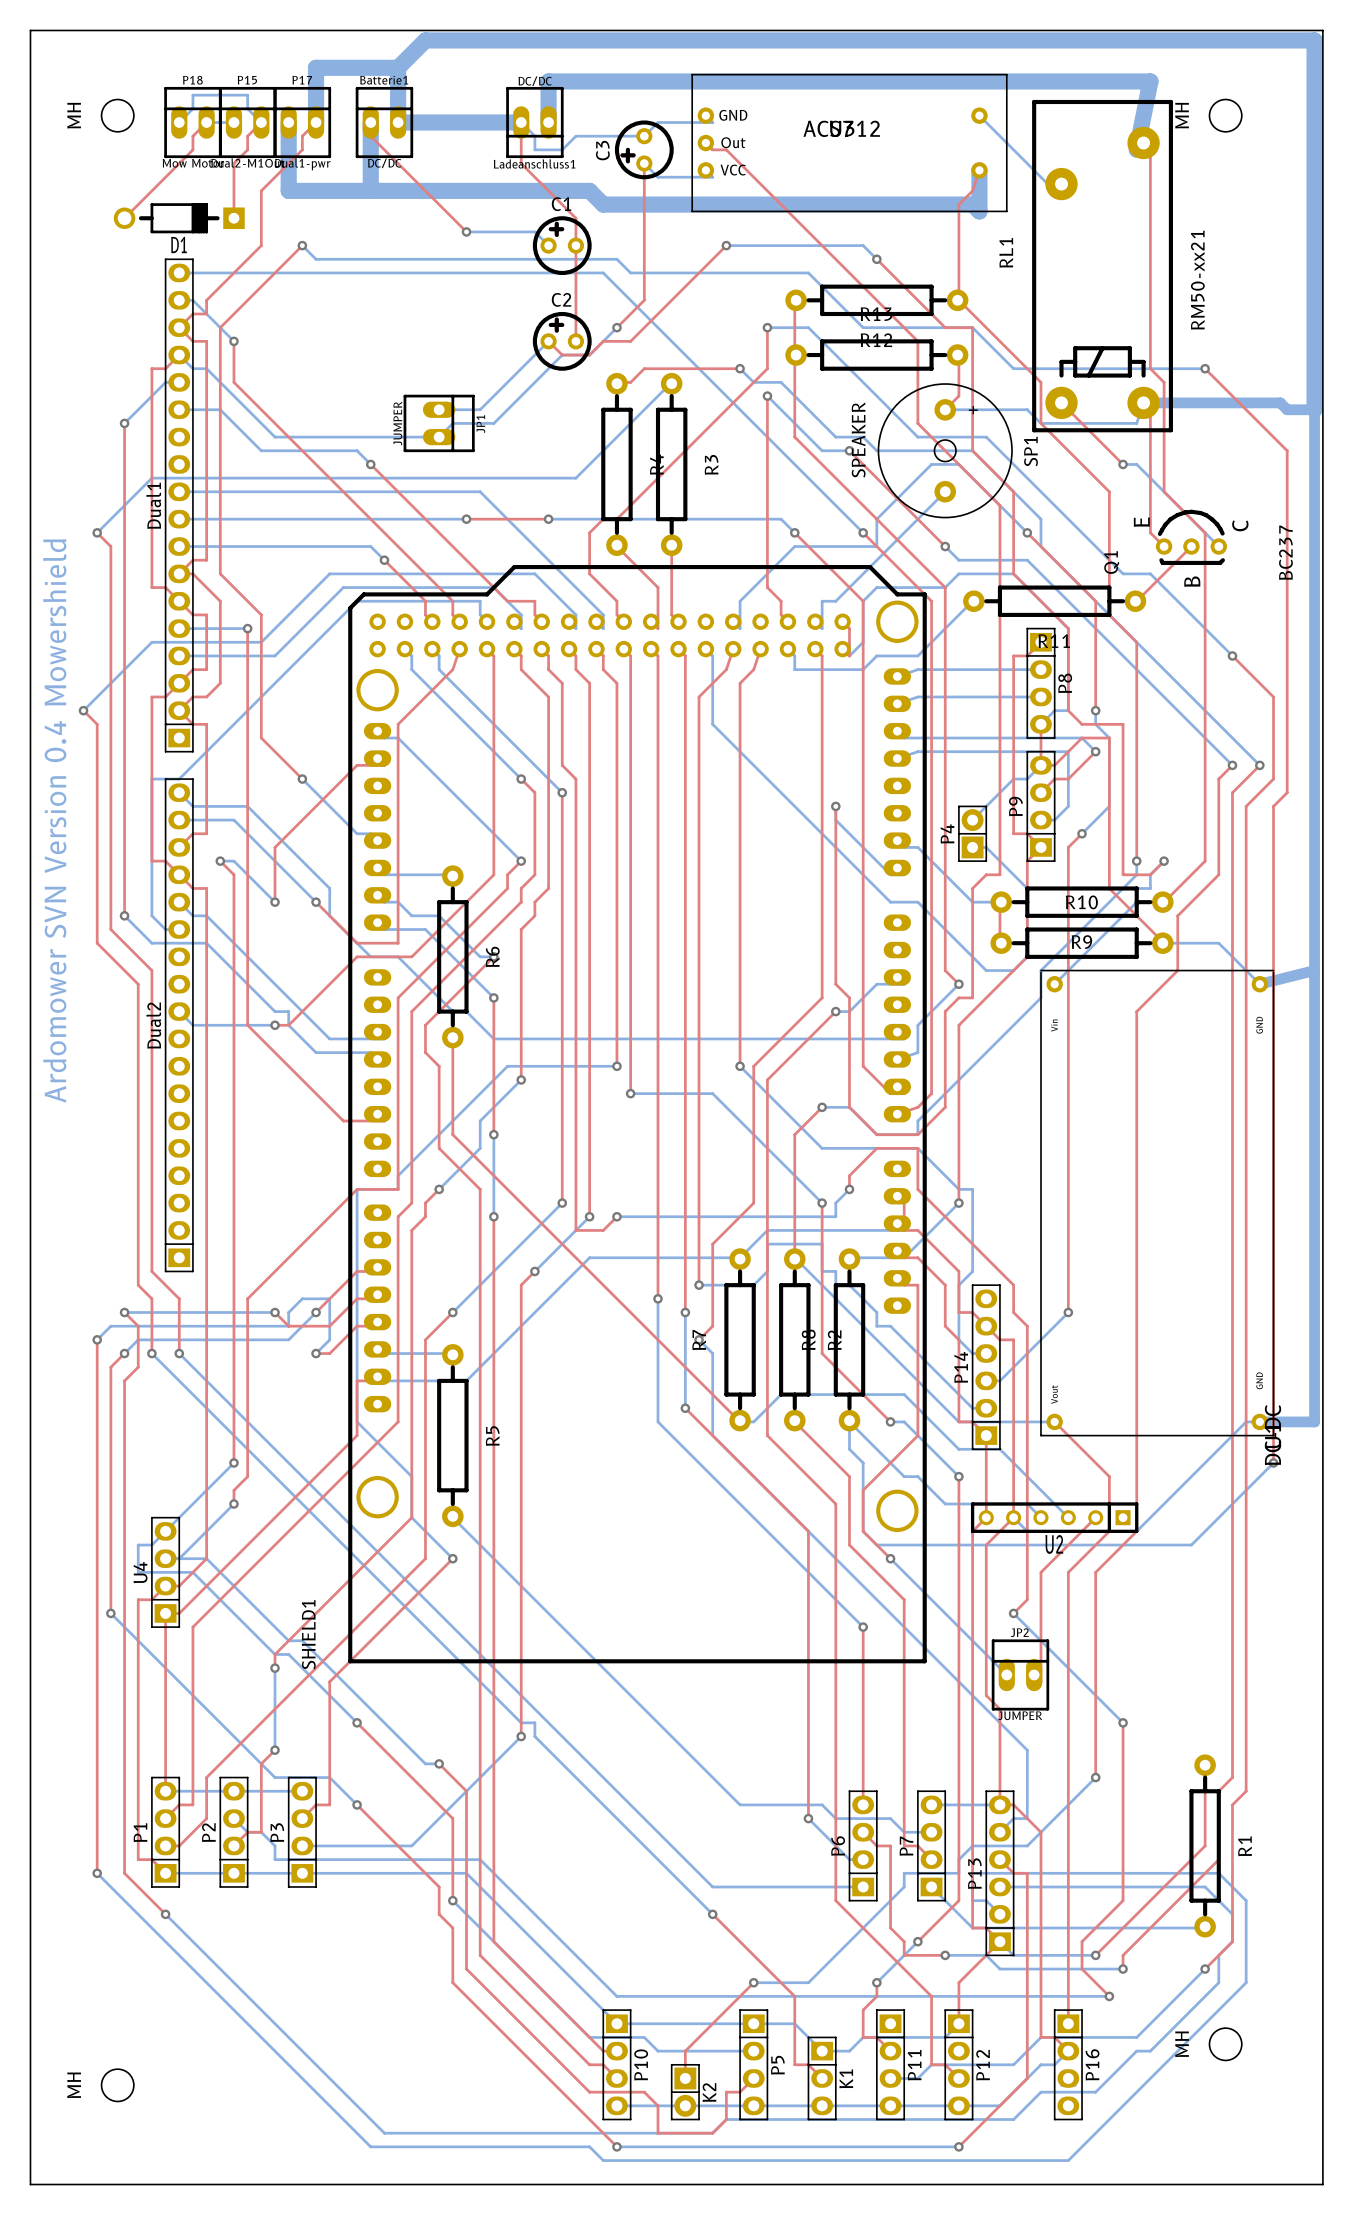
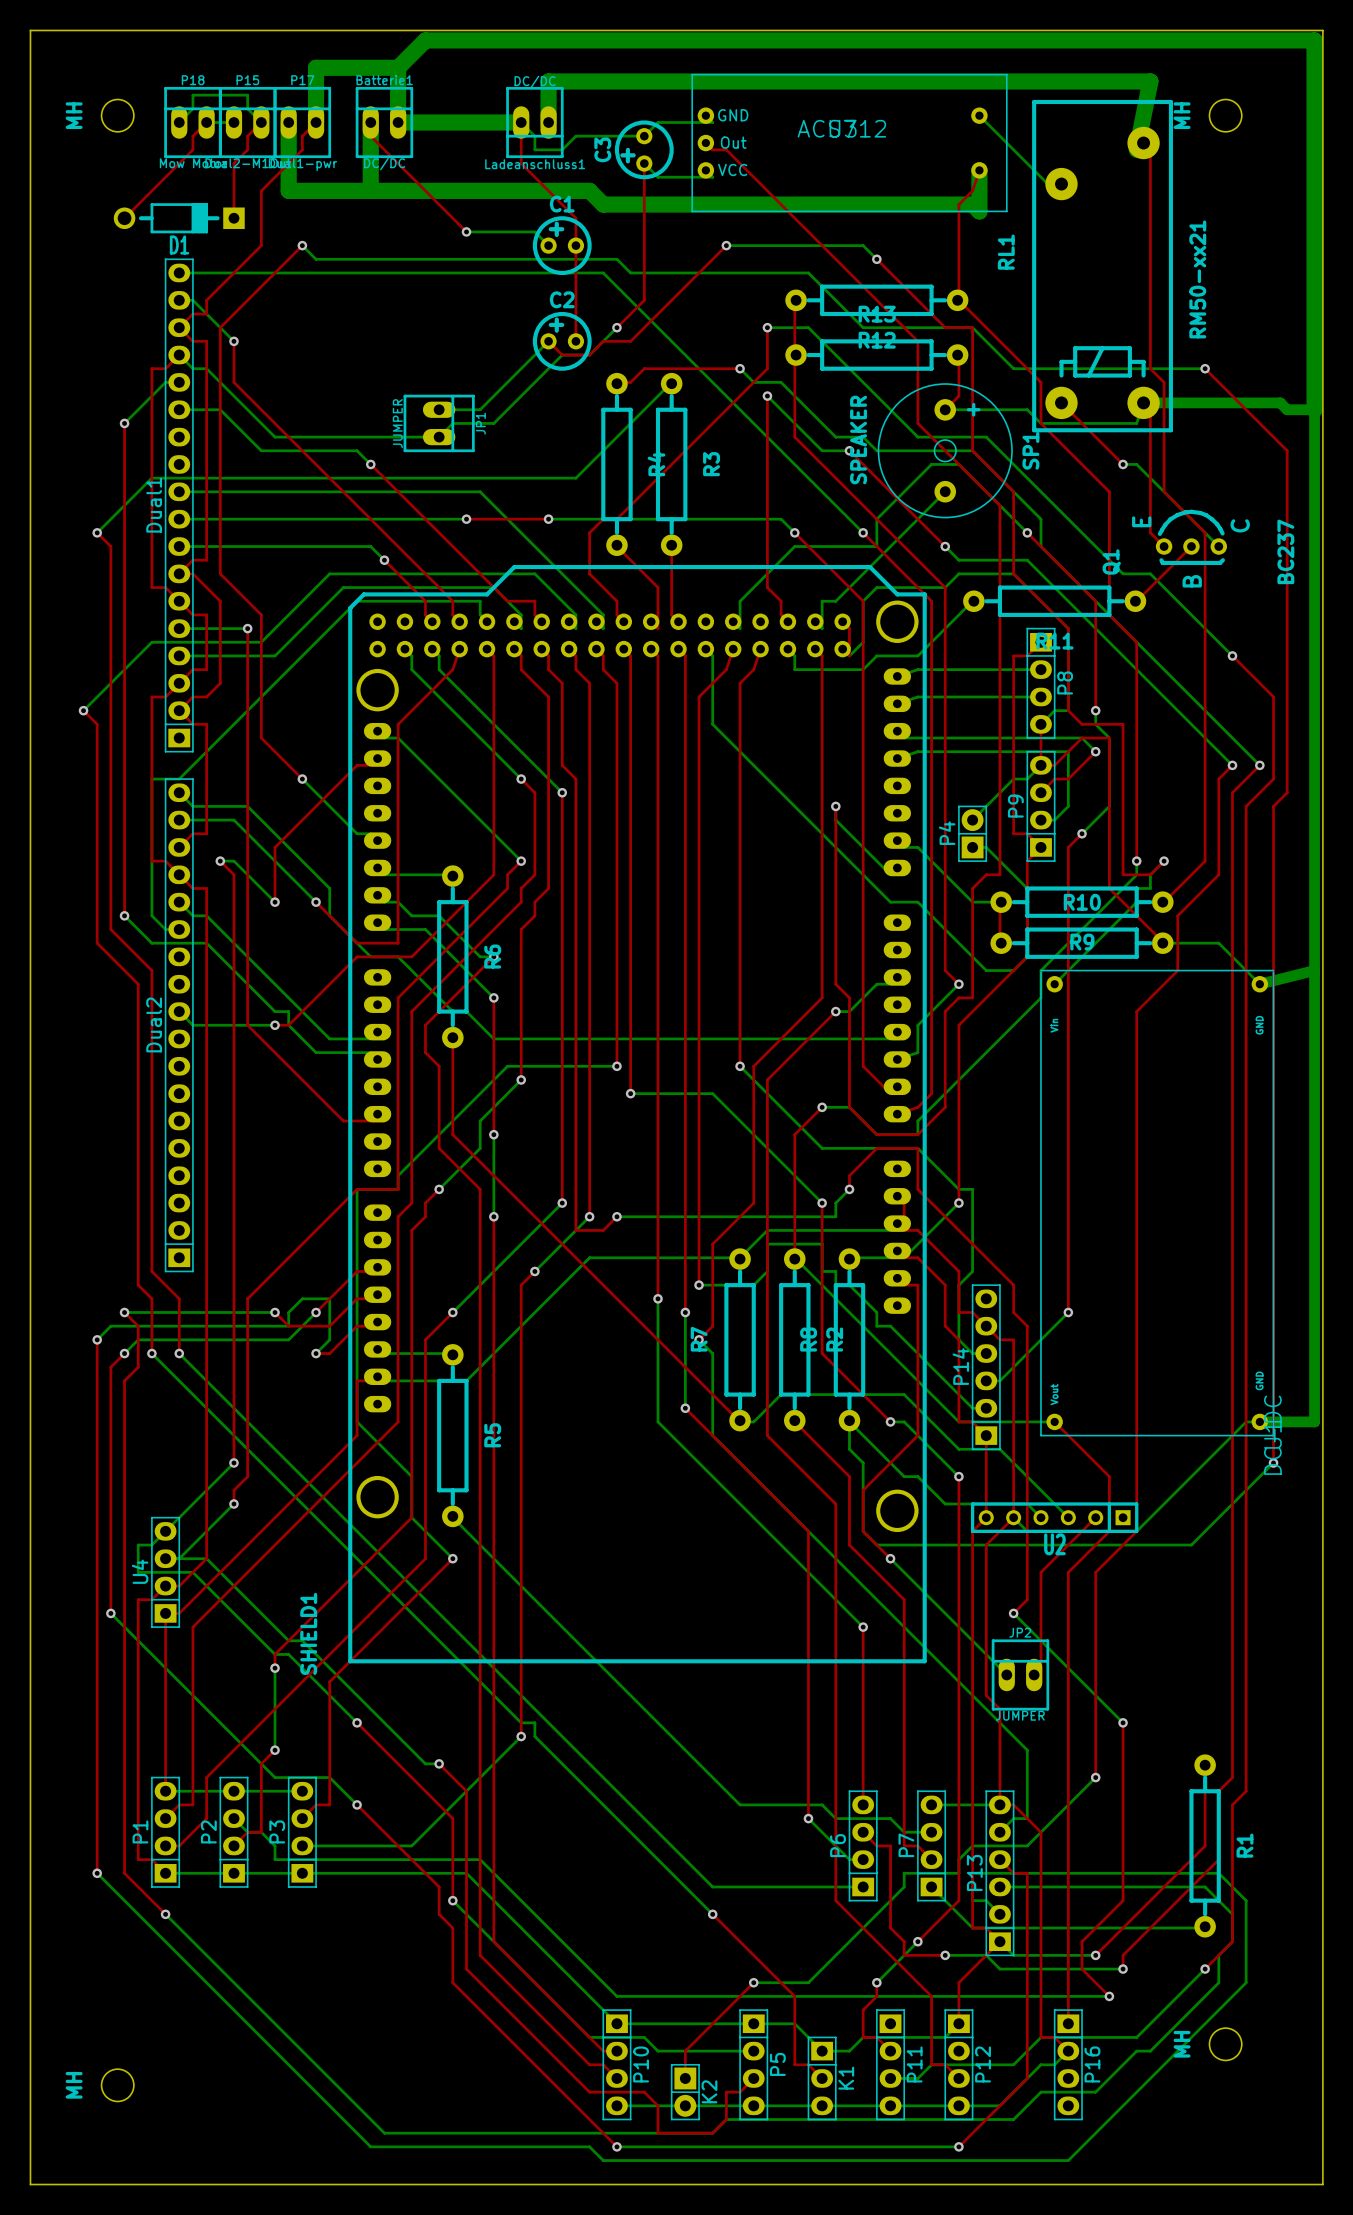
text: Ardomower SVN Version 0.4 Mowershield (54, 820) -> none

